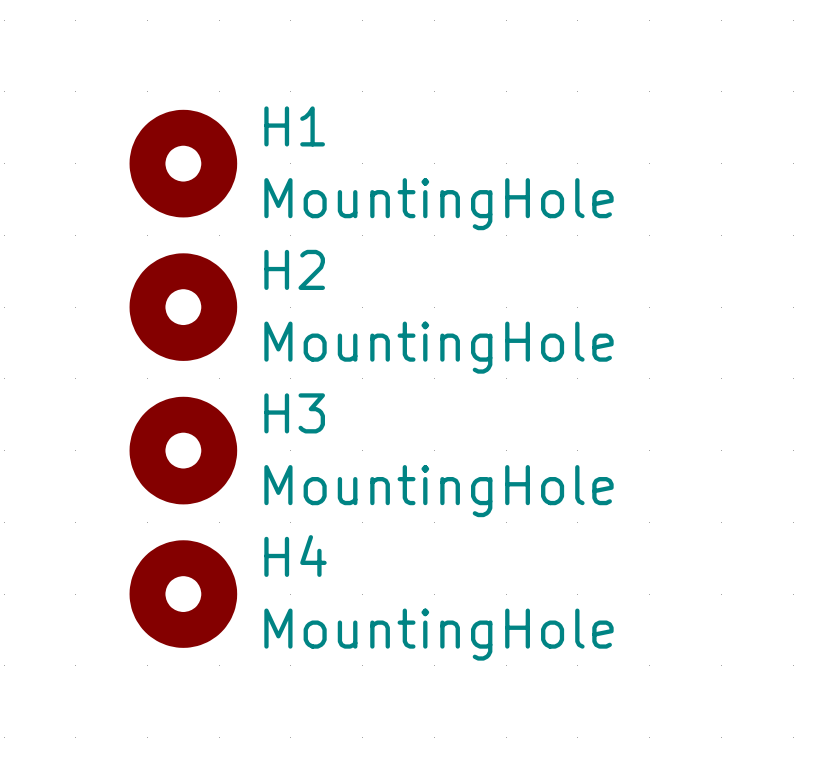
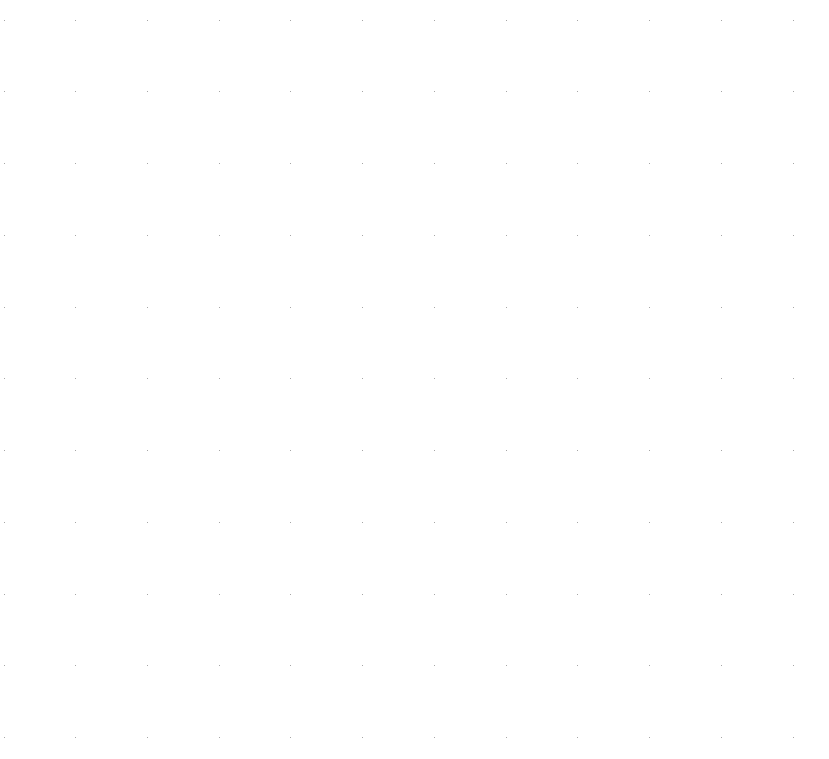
H1: MountingHole (183, 163) -> none
H2: MountingHole (183, 307) -> none
H3: MountingHole (183, 450) -> none
H4: MountingHole (183, 594) -> none

